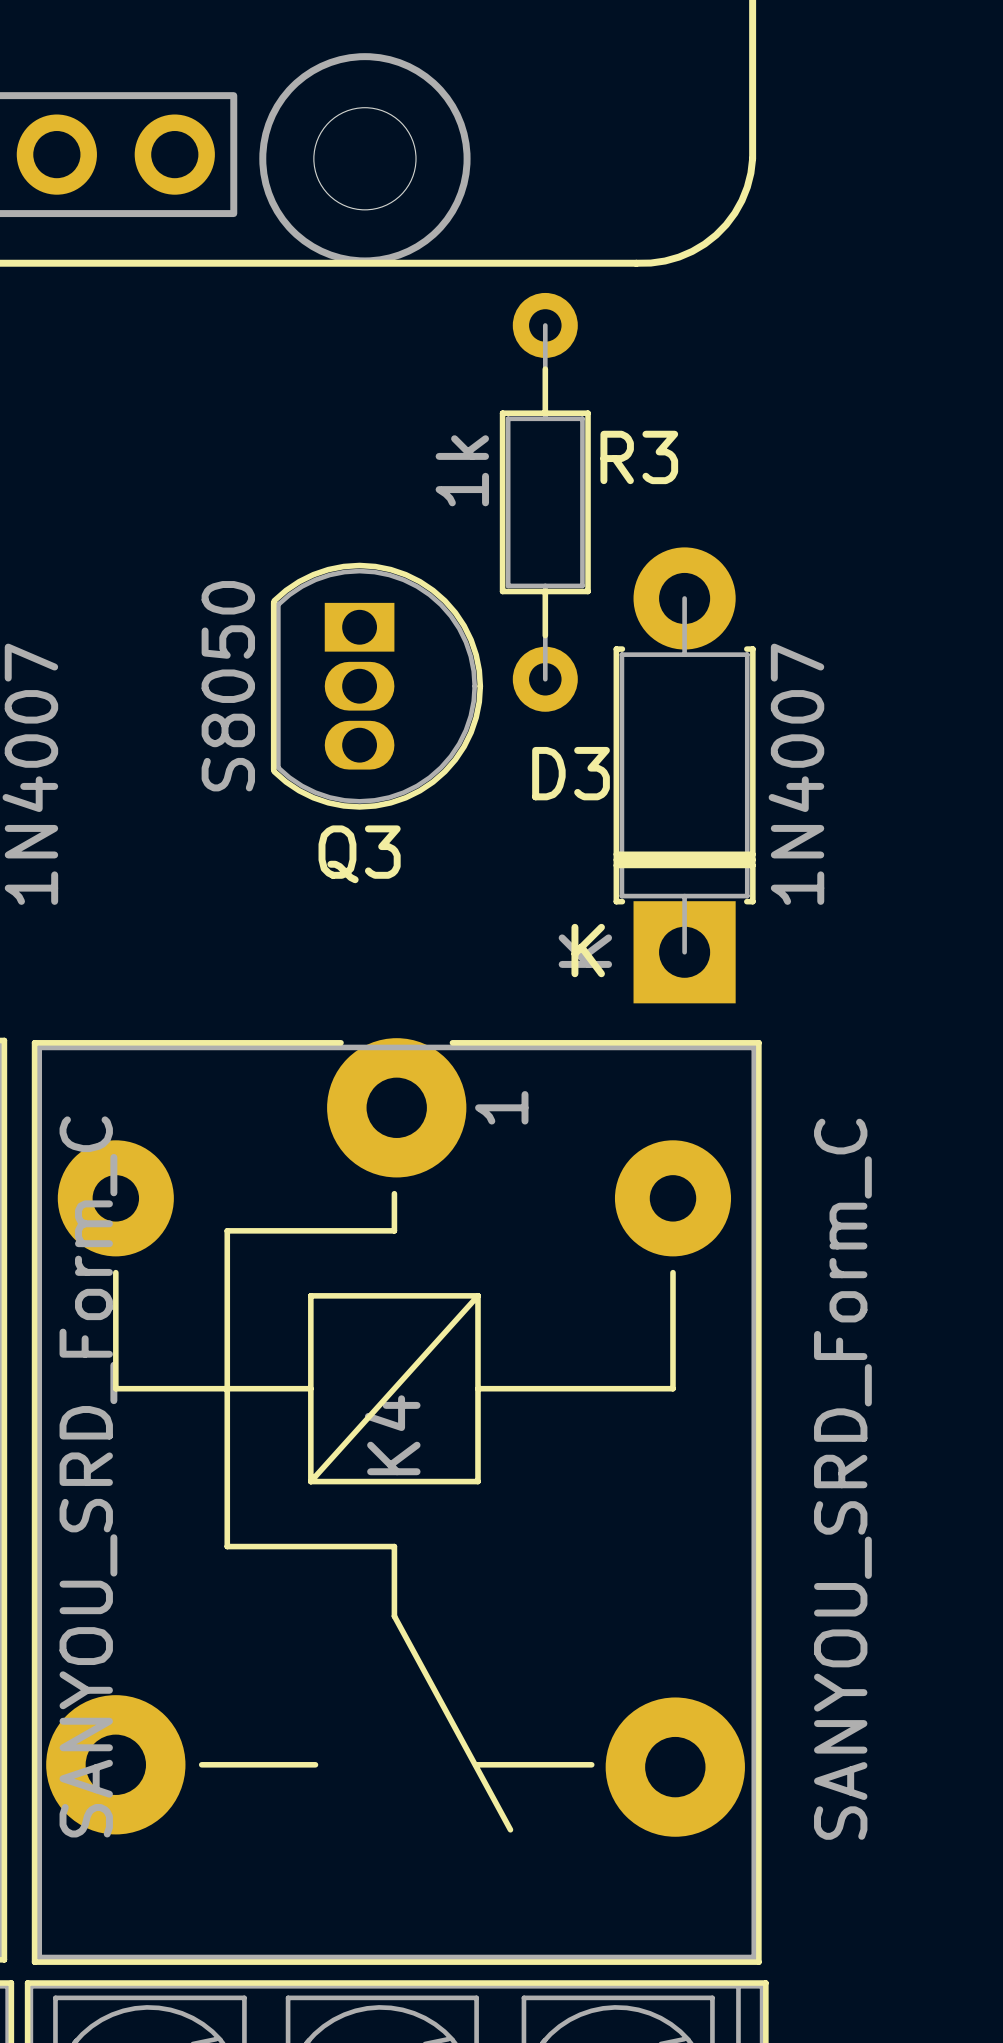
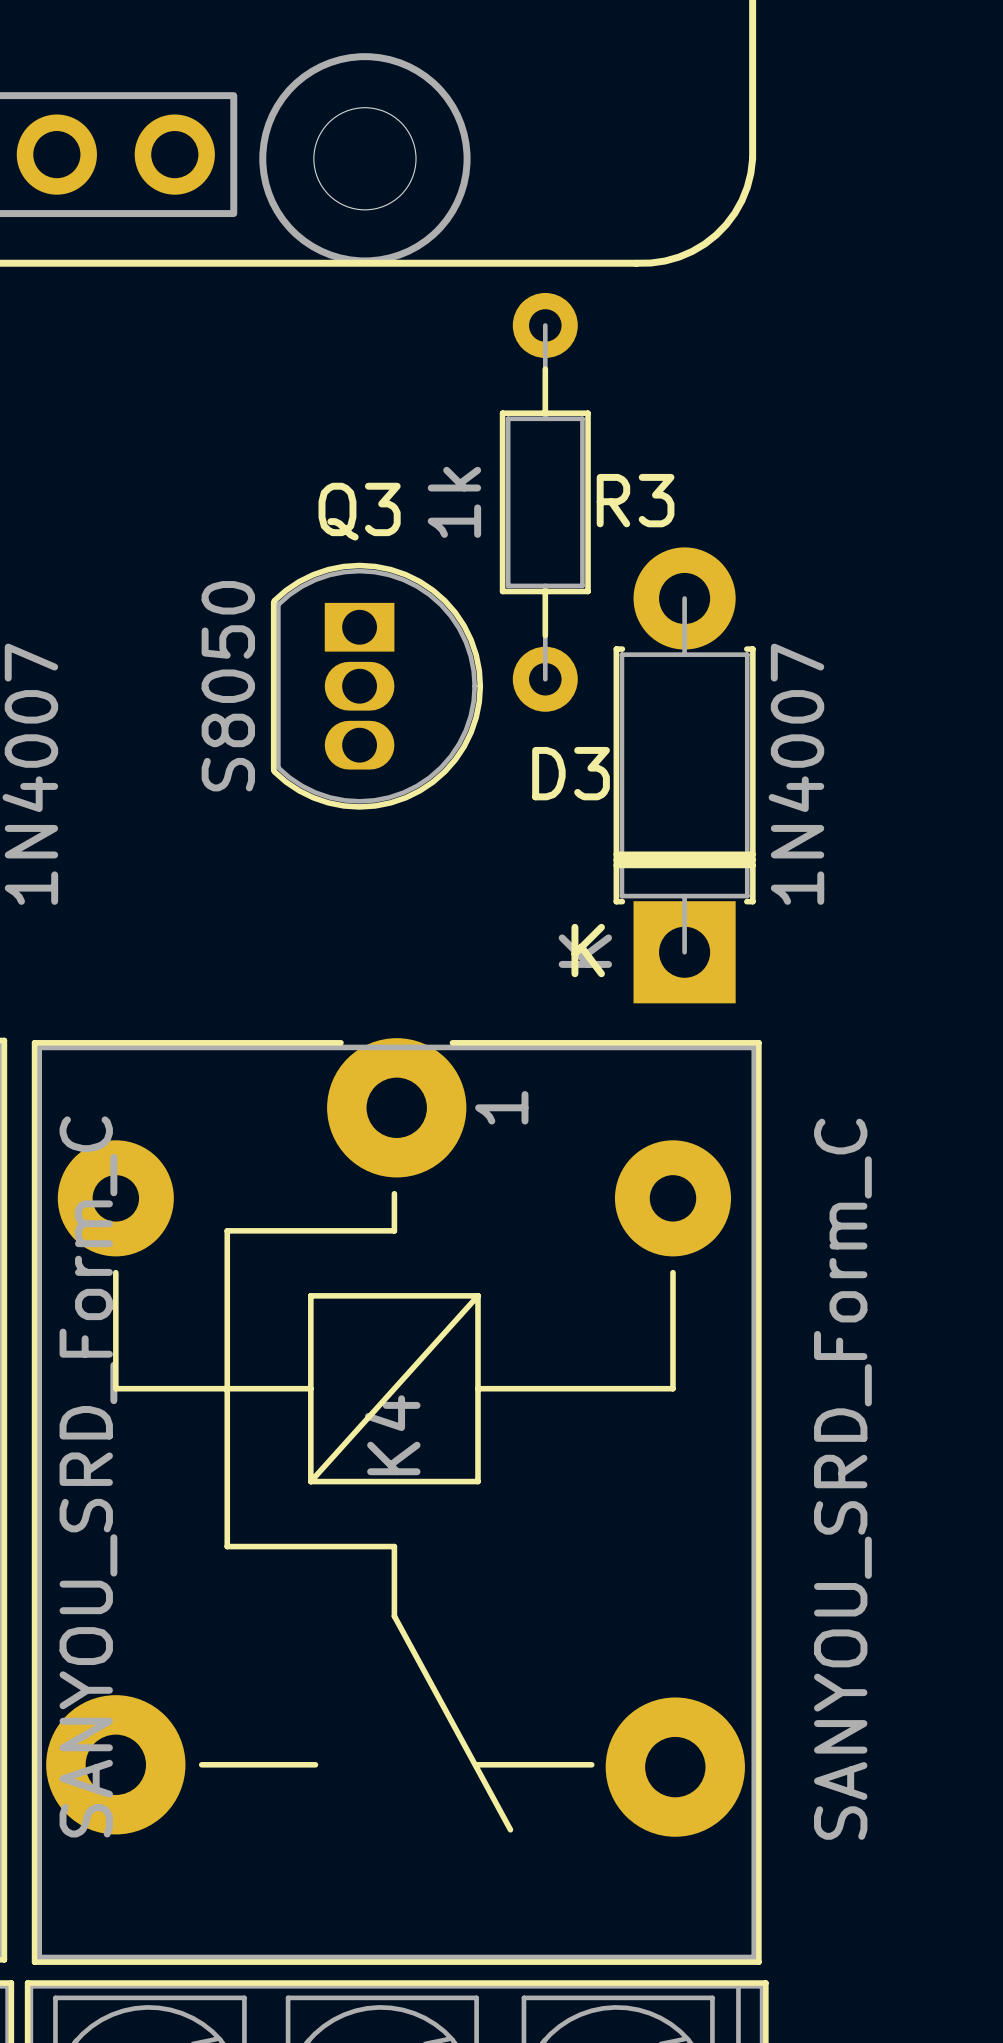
R3 name position: R3 (639, 457) -> R3 (635, 500)
R3 value position: 1k (462, 470) -> 1k (454, 502)
Q3 name position: Q3 (359, 854) -> Q3 (359, 511)

